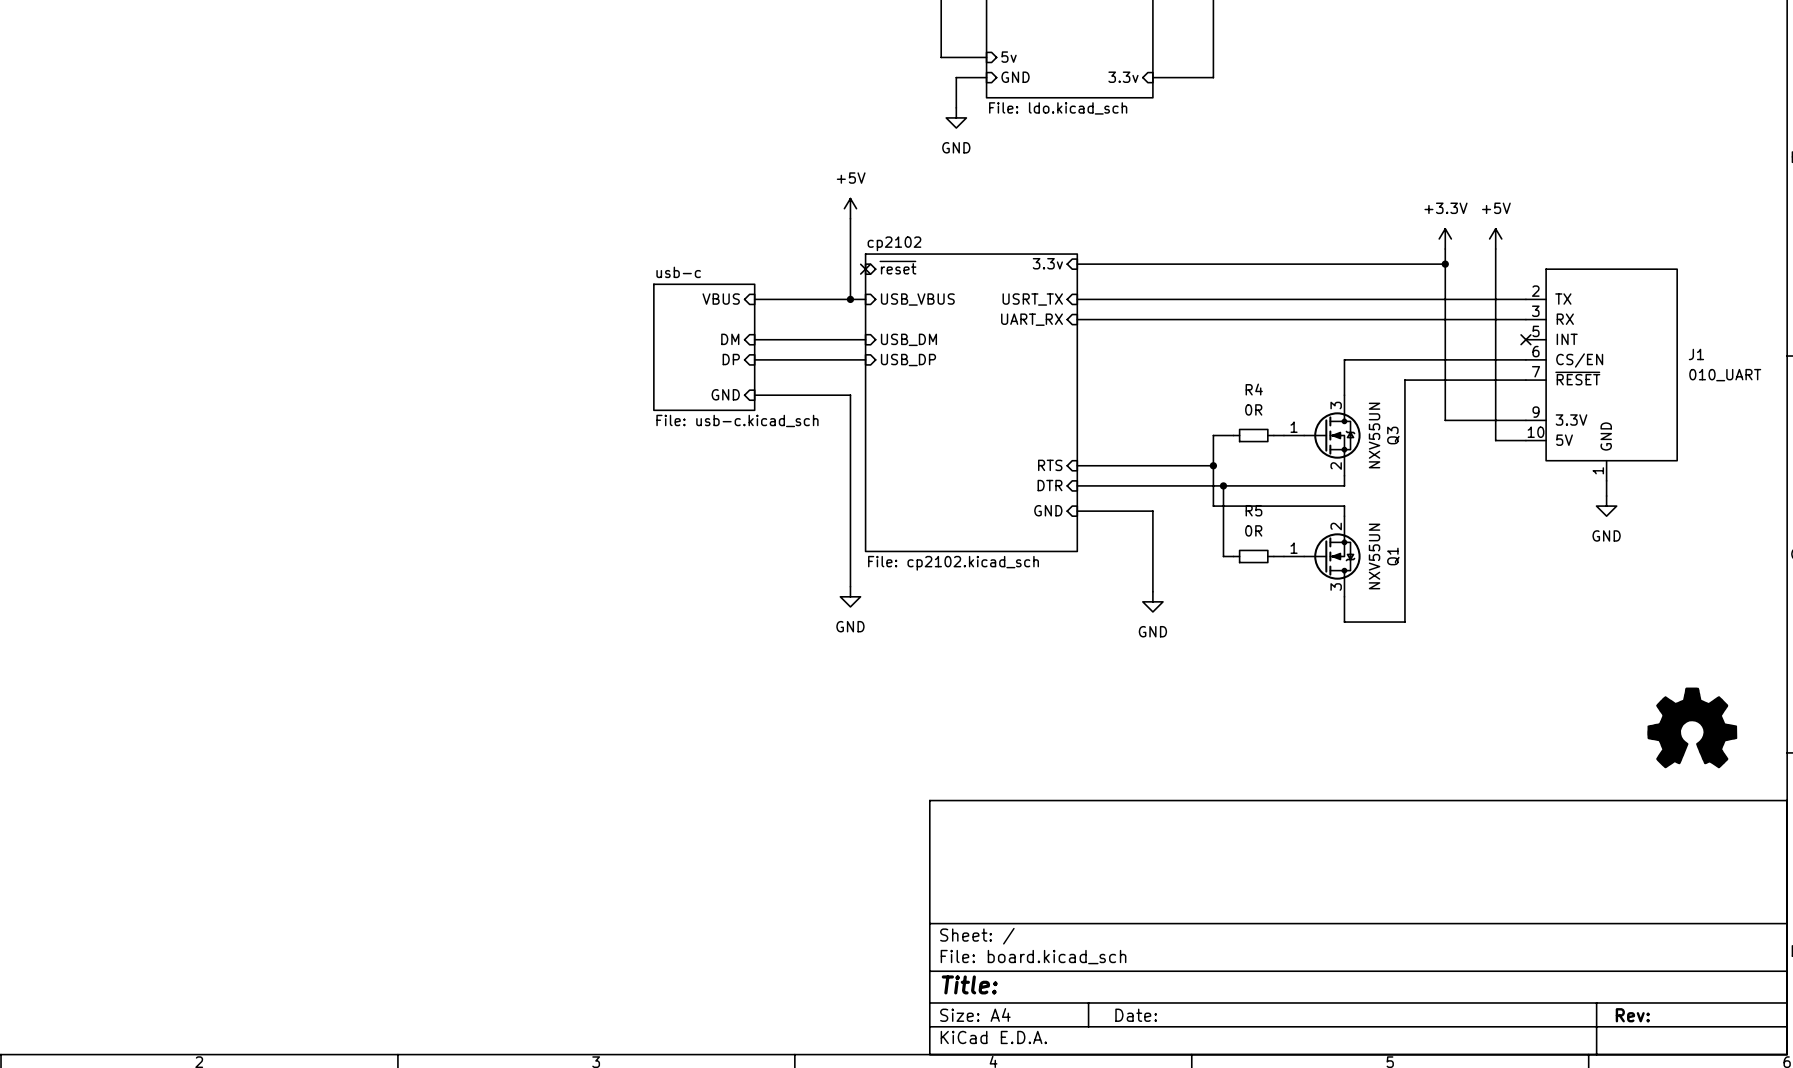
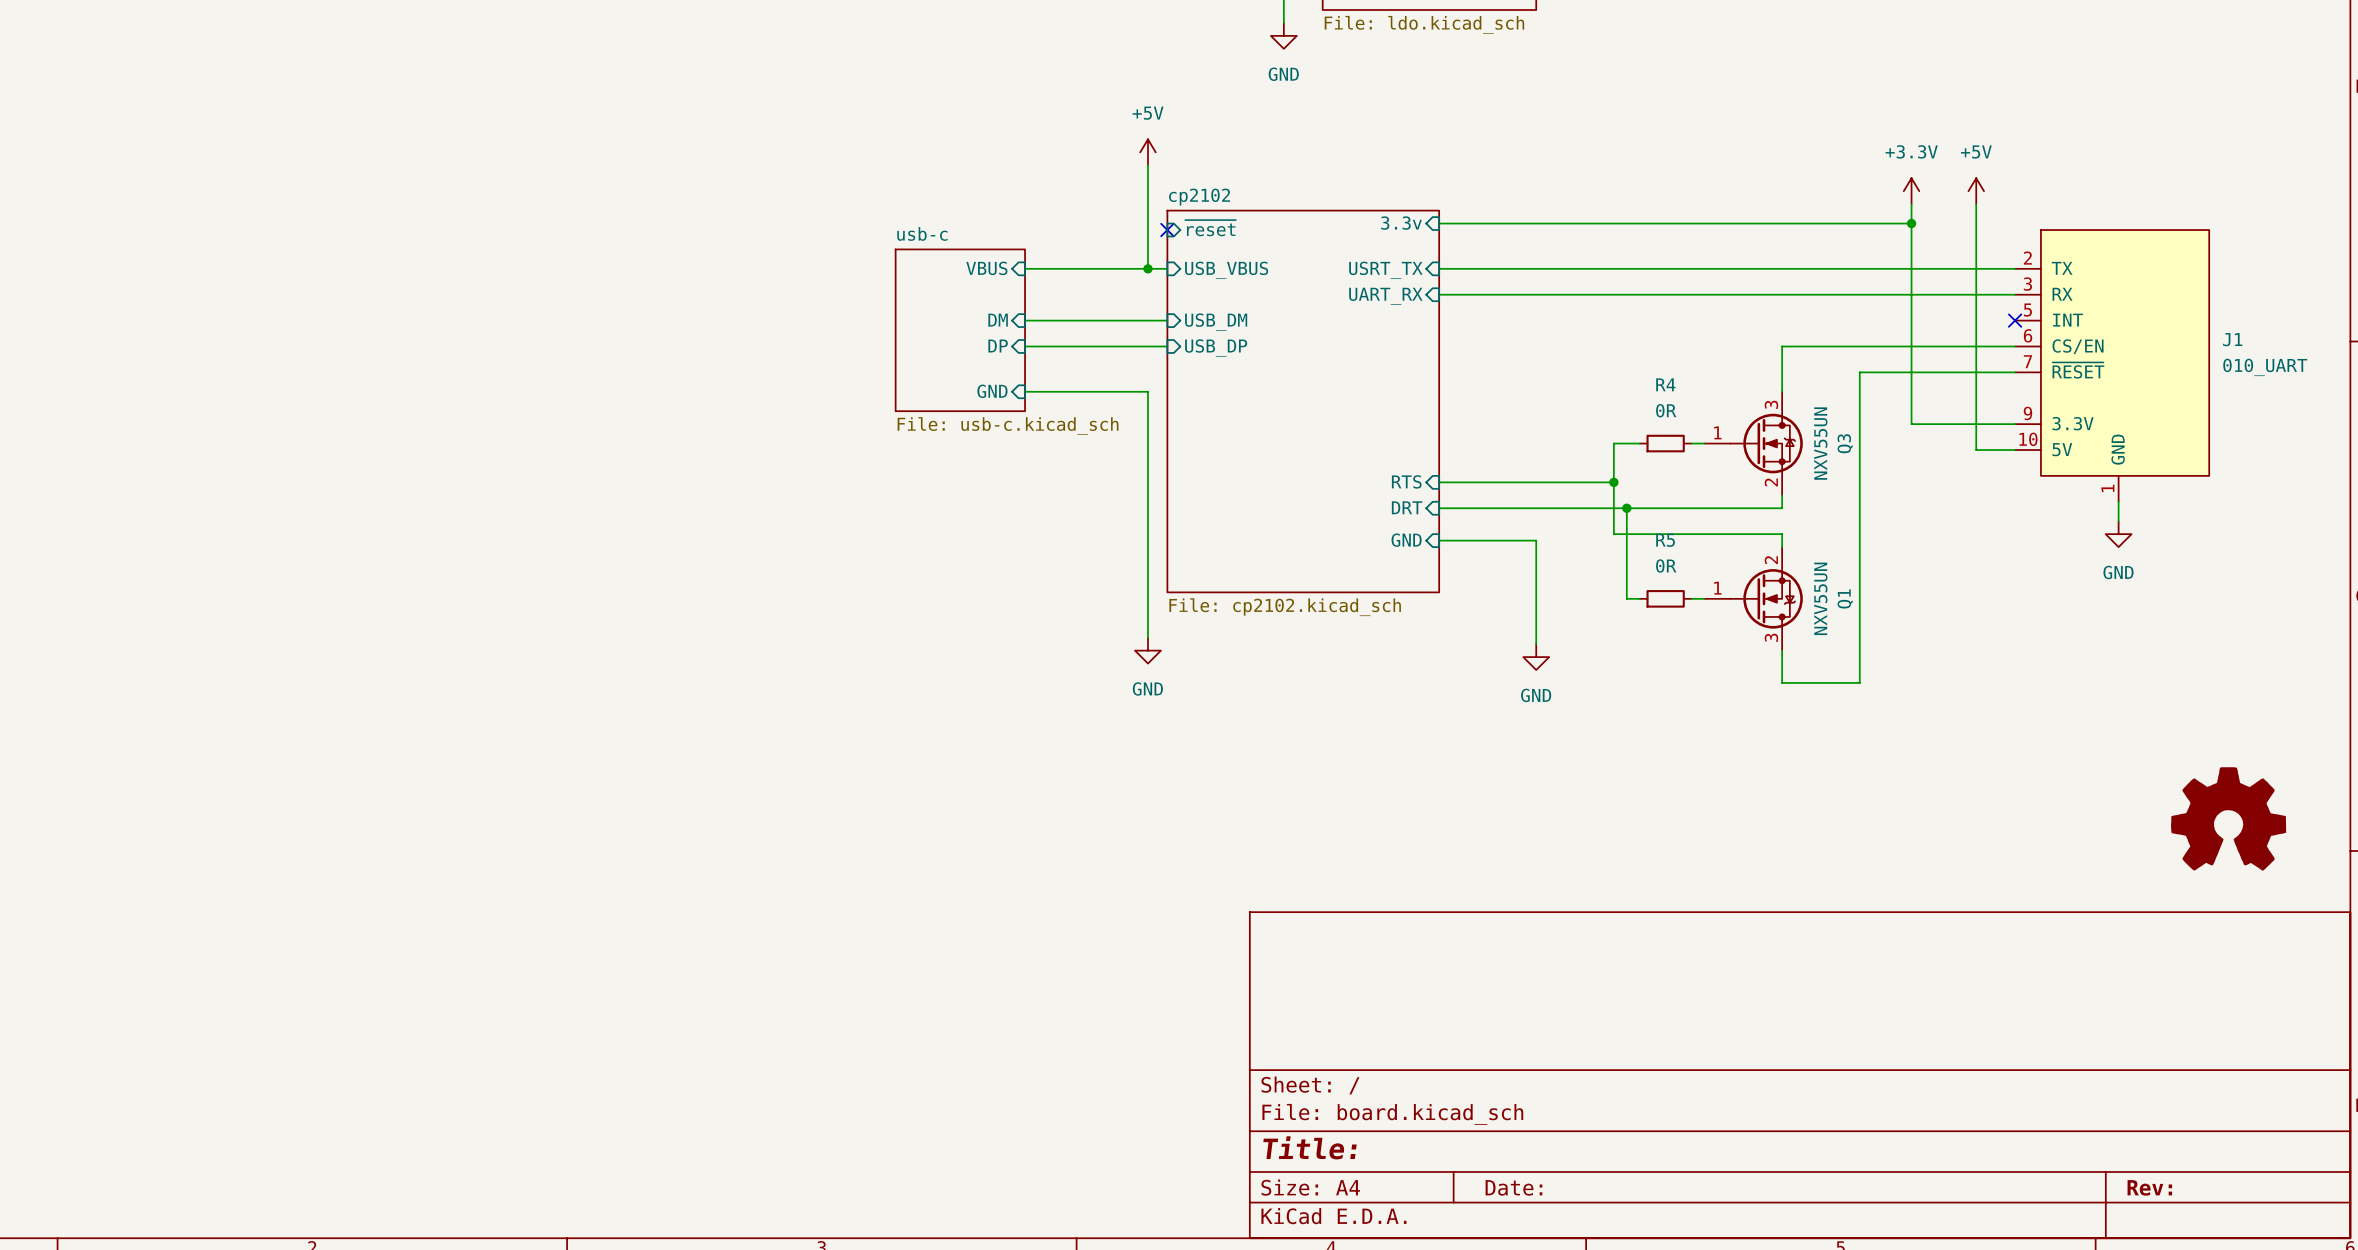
sheet pin: DTR (1050, 485) -> DRT (1407, 507)

